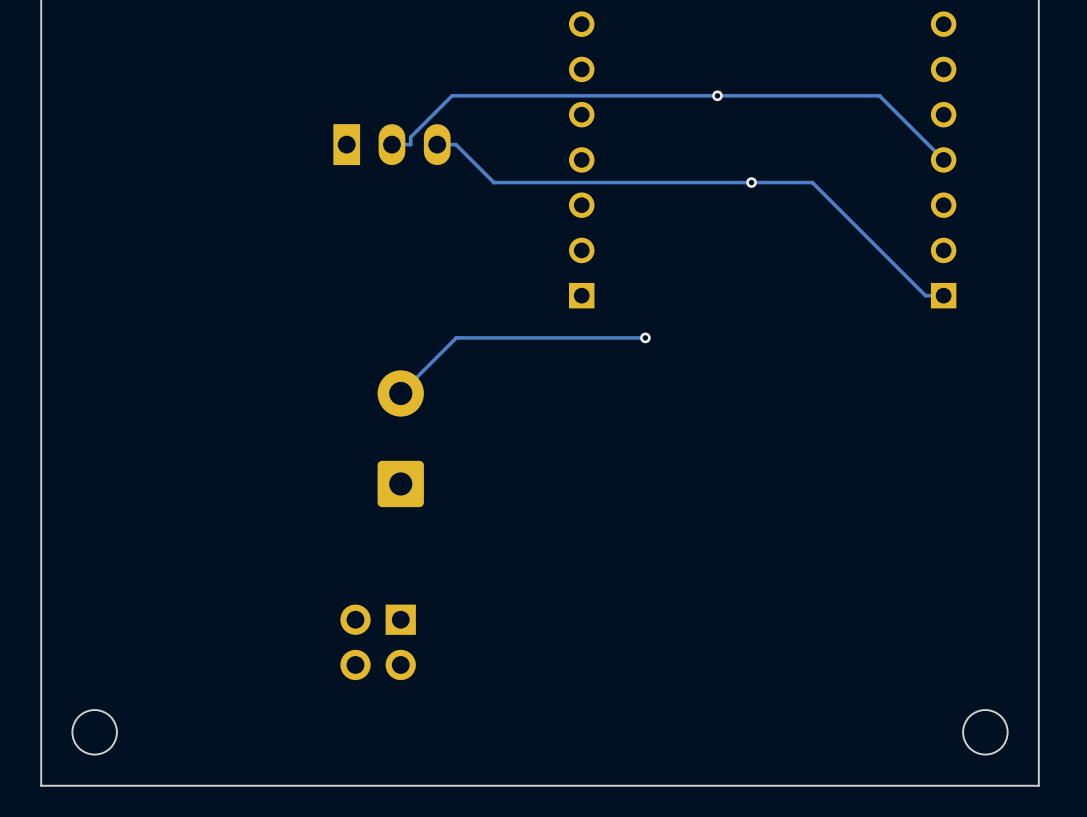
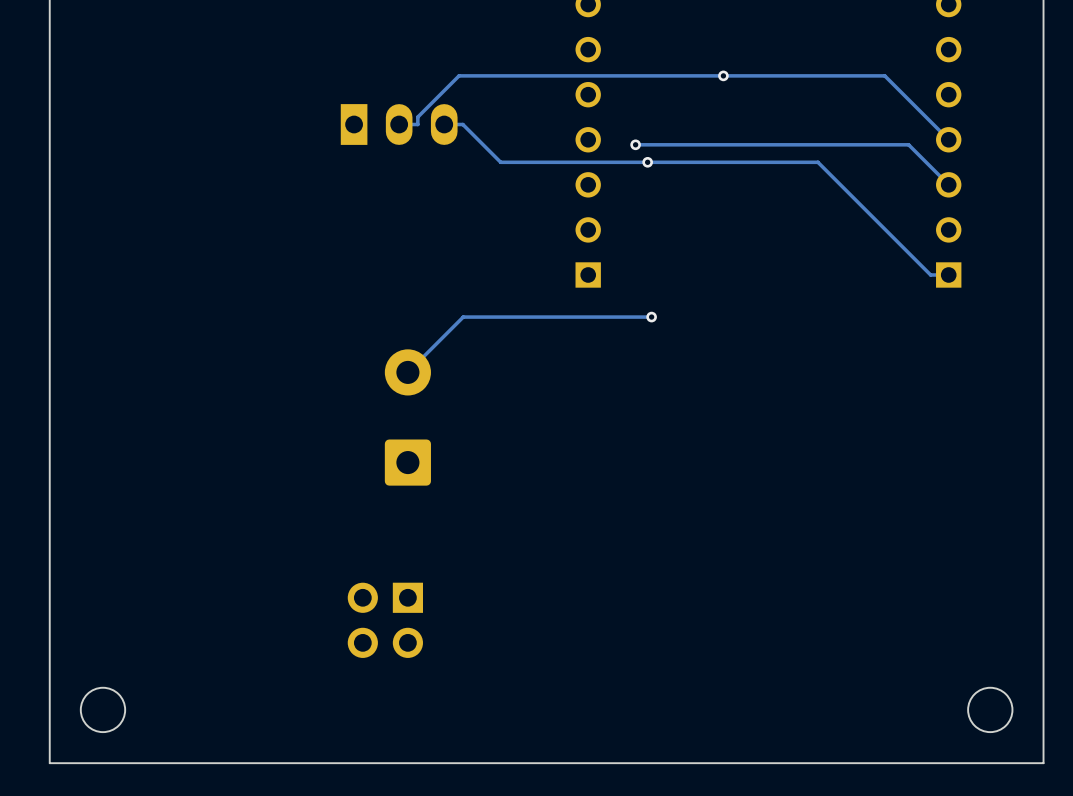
track: none -> (635, 144) (908, 144) (948, 184)
via: none -> (635, 144)
via: none -> (647, 162)
via: (751, 182) -> none

